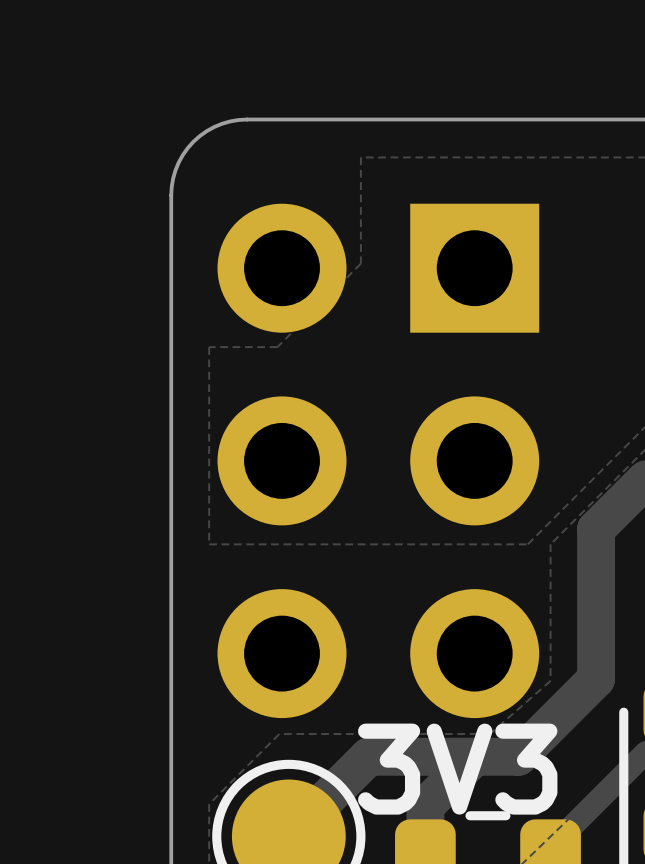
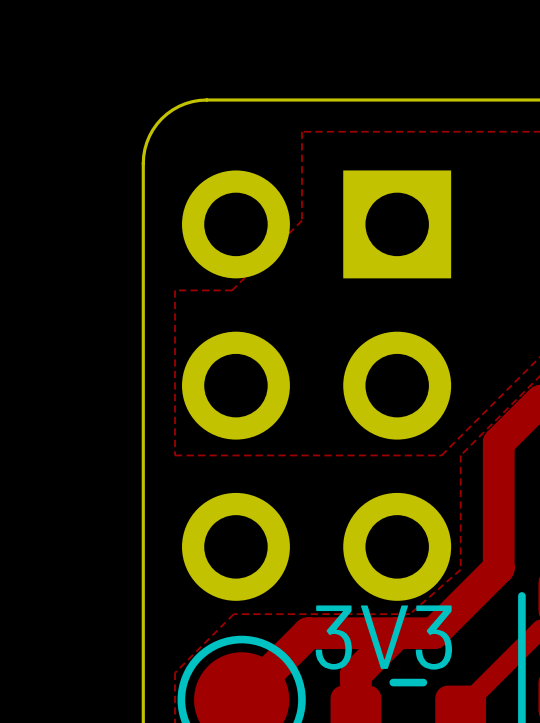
part value: none -> 3V3 (383, 637)
text: 3V3 (457, 769) -> none

